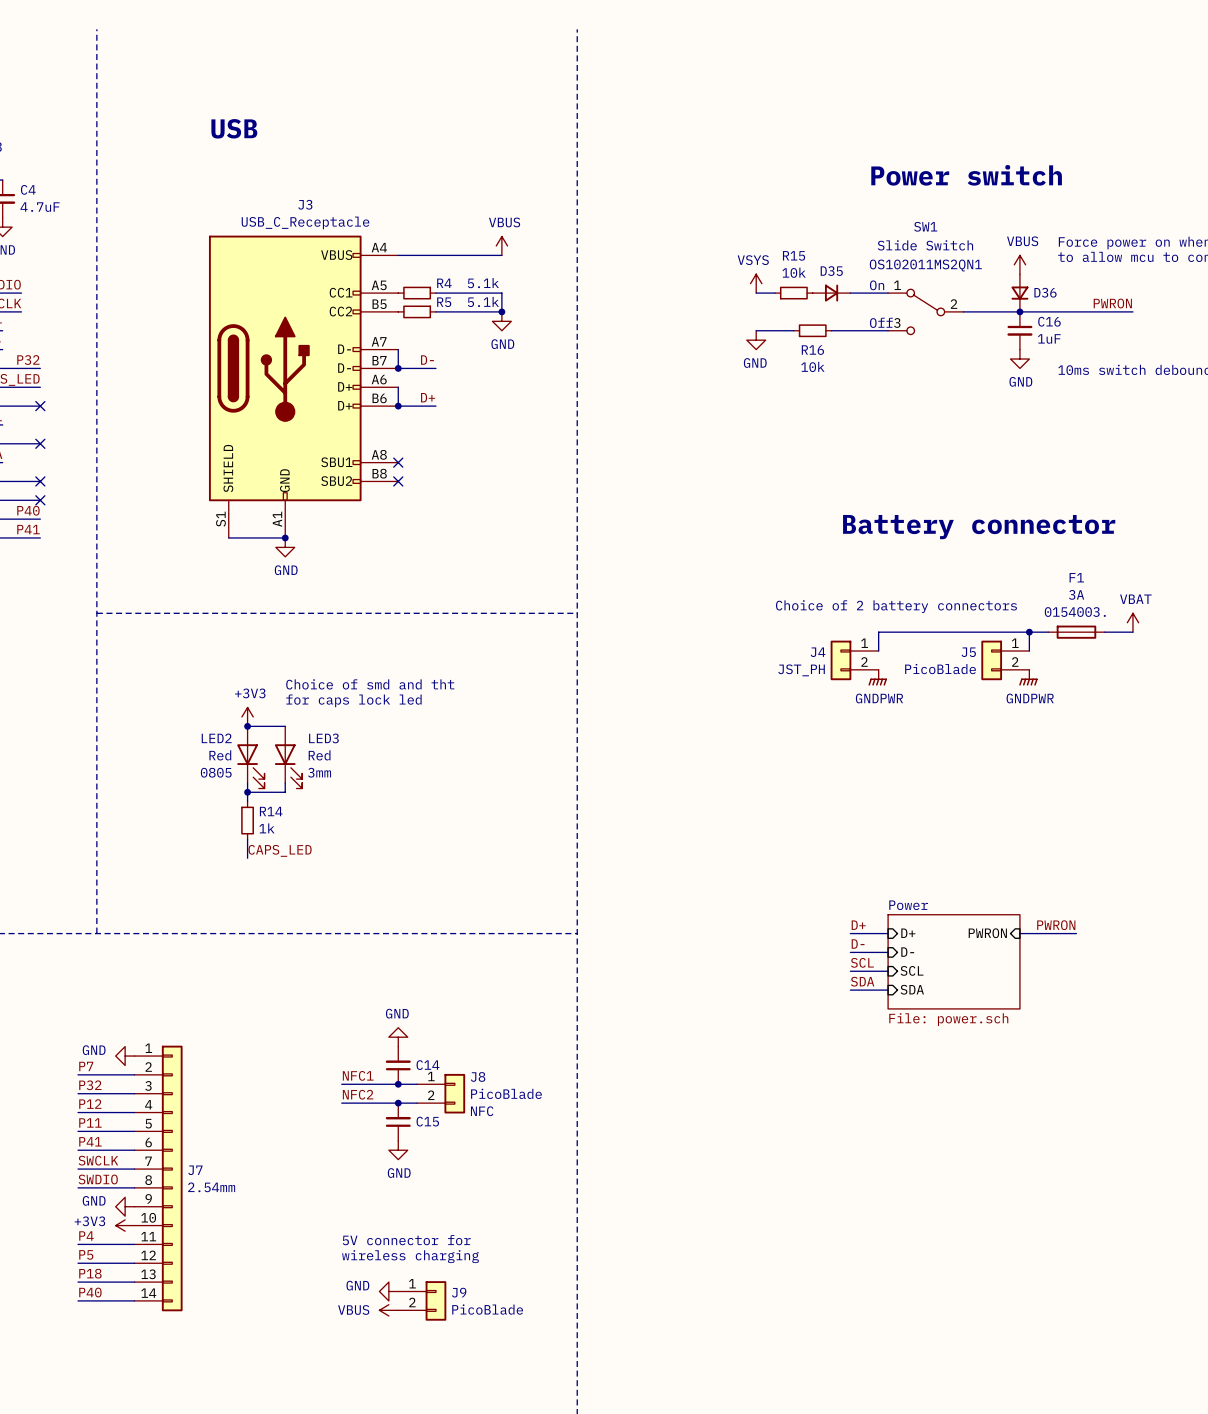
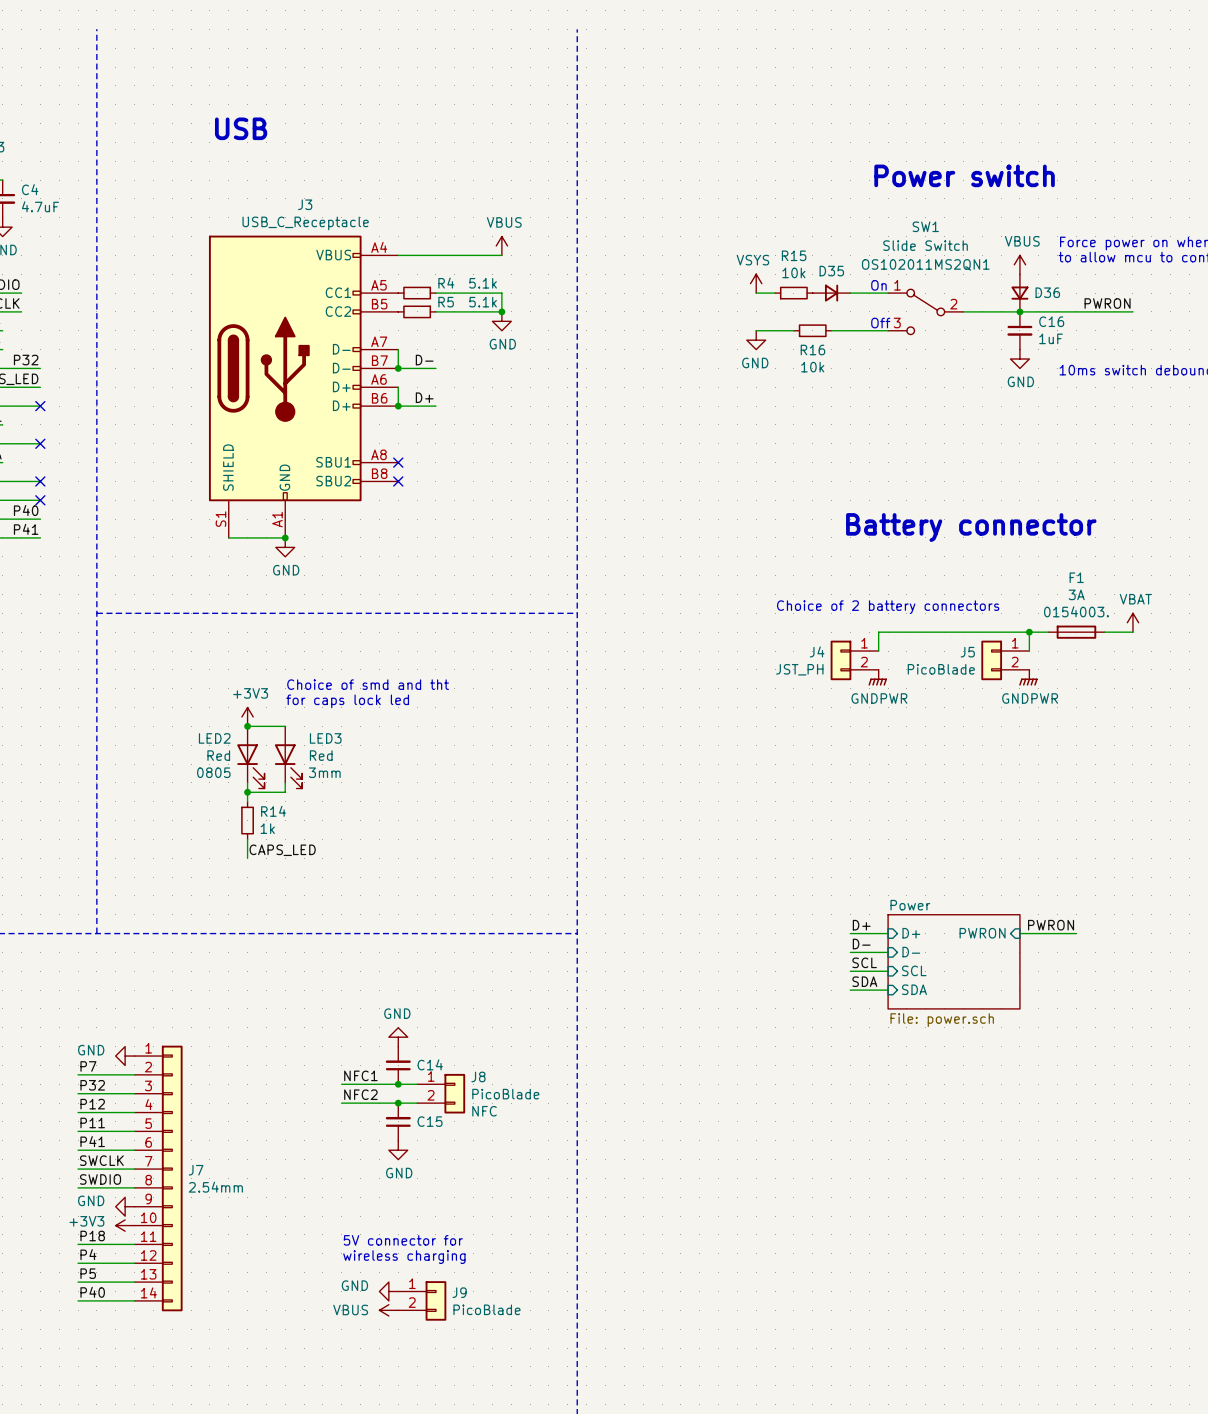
label: P4 (86, 1236) -> P18 (92, 1236)
label: P5 (86, 1254) -> P4 (88, 1254)
label: P18 (90, 1273) -> P5 (88, 1273)

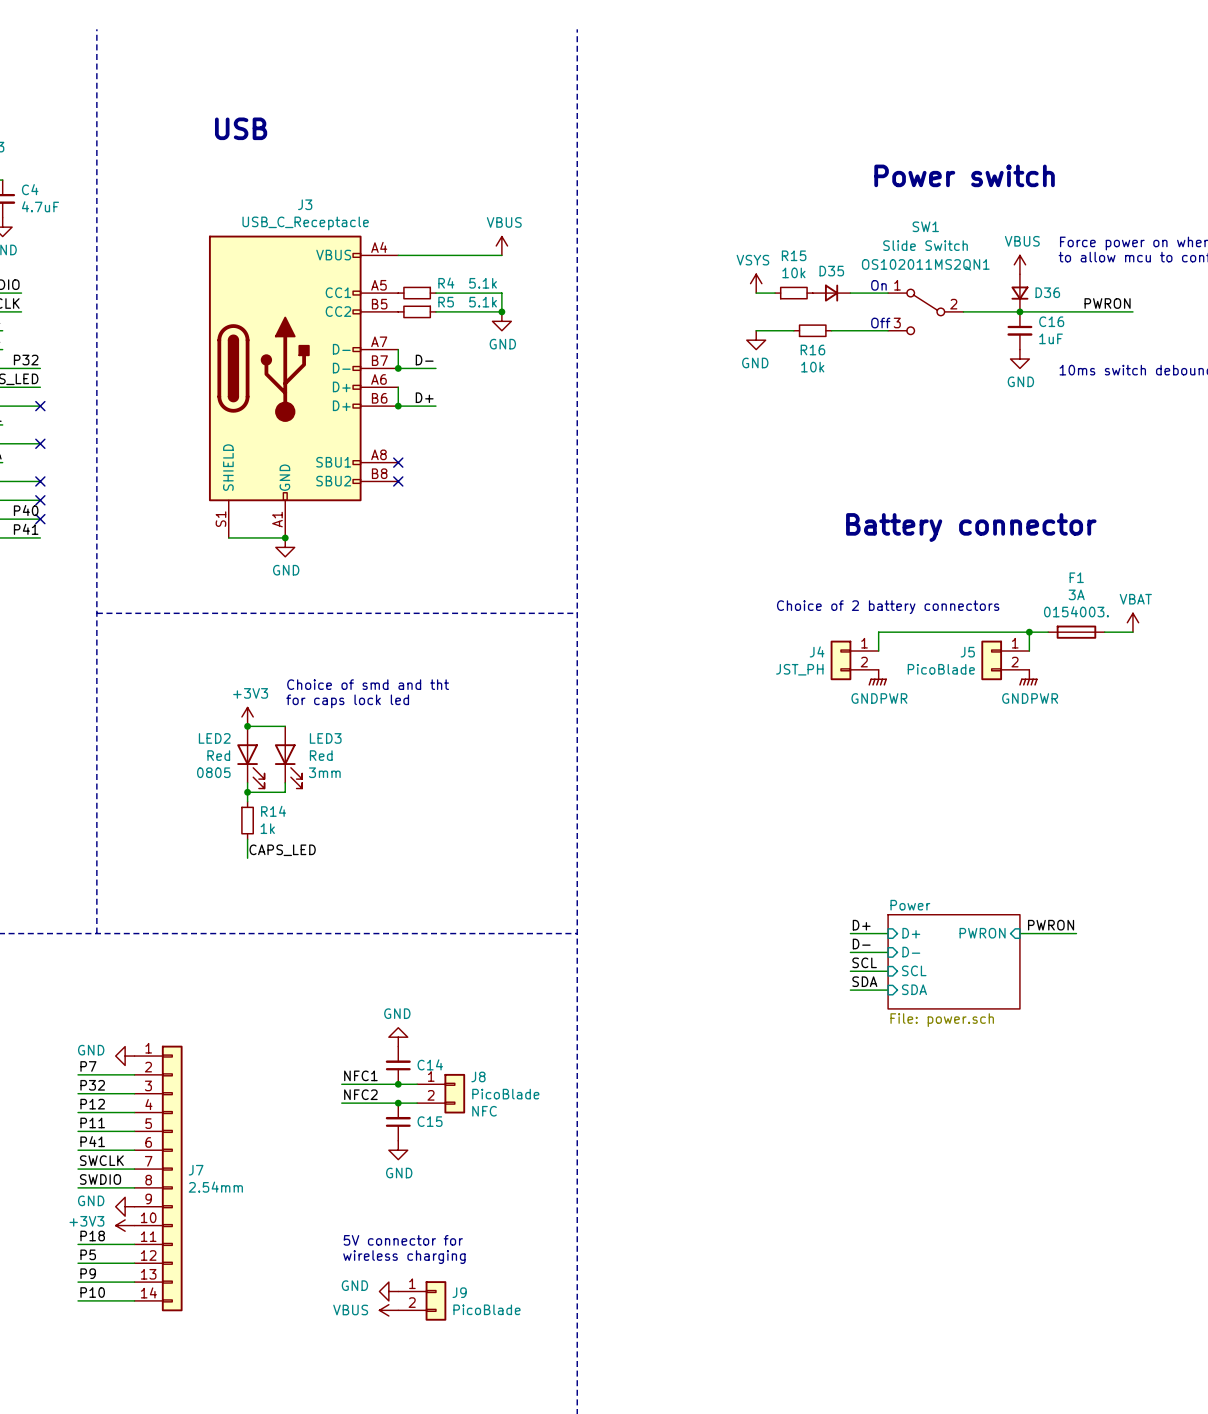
no-connect mark: none -> (40, 519)
label: P4 (88, 1254) -> P5 (88, 1254)
label: P5 (88, 1273) -> P9 (88, 1273)
label: P40 (92, 1292) -> P10 (92, 1292)

